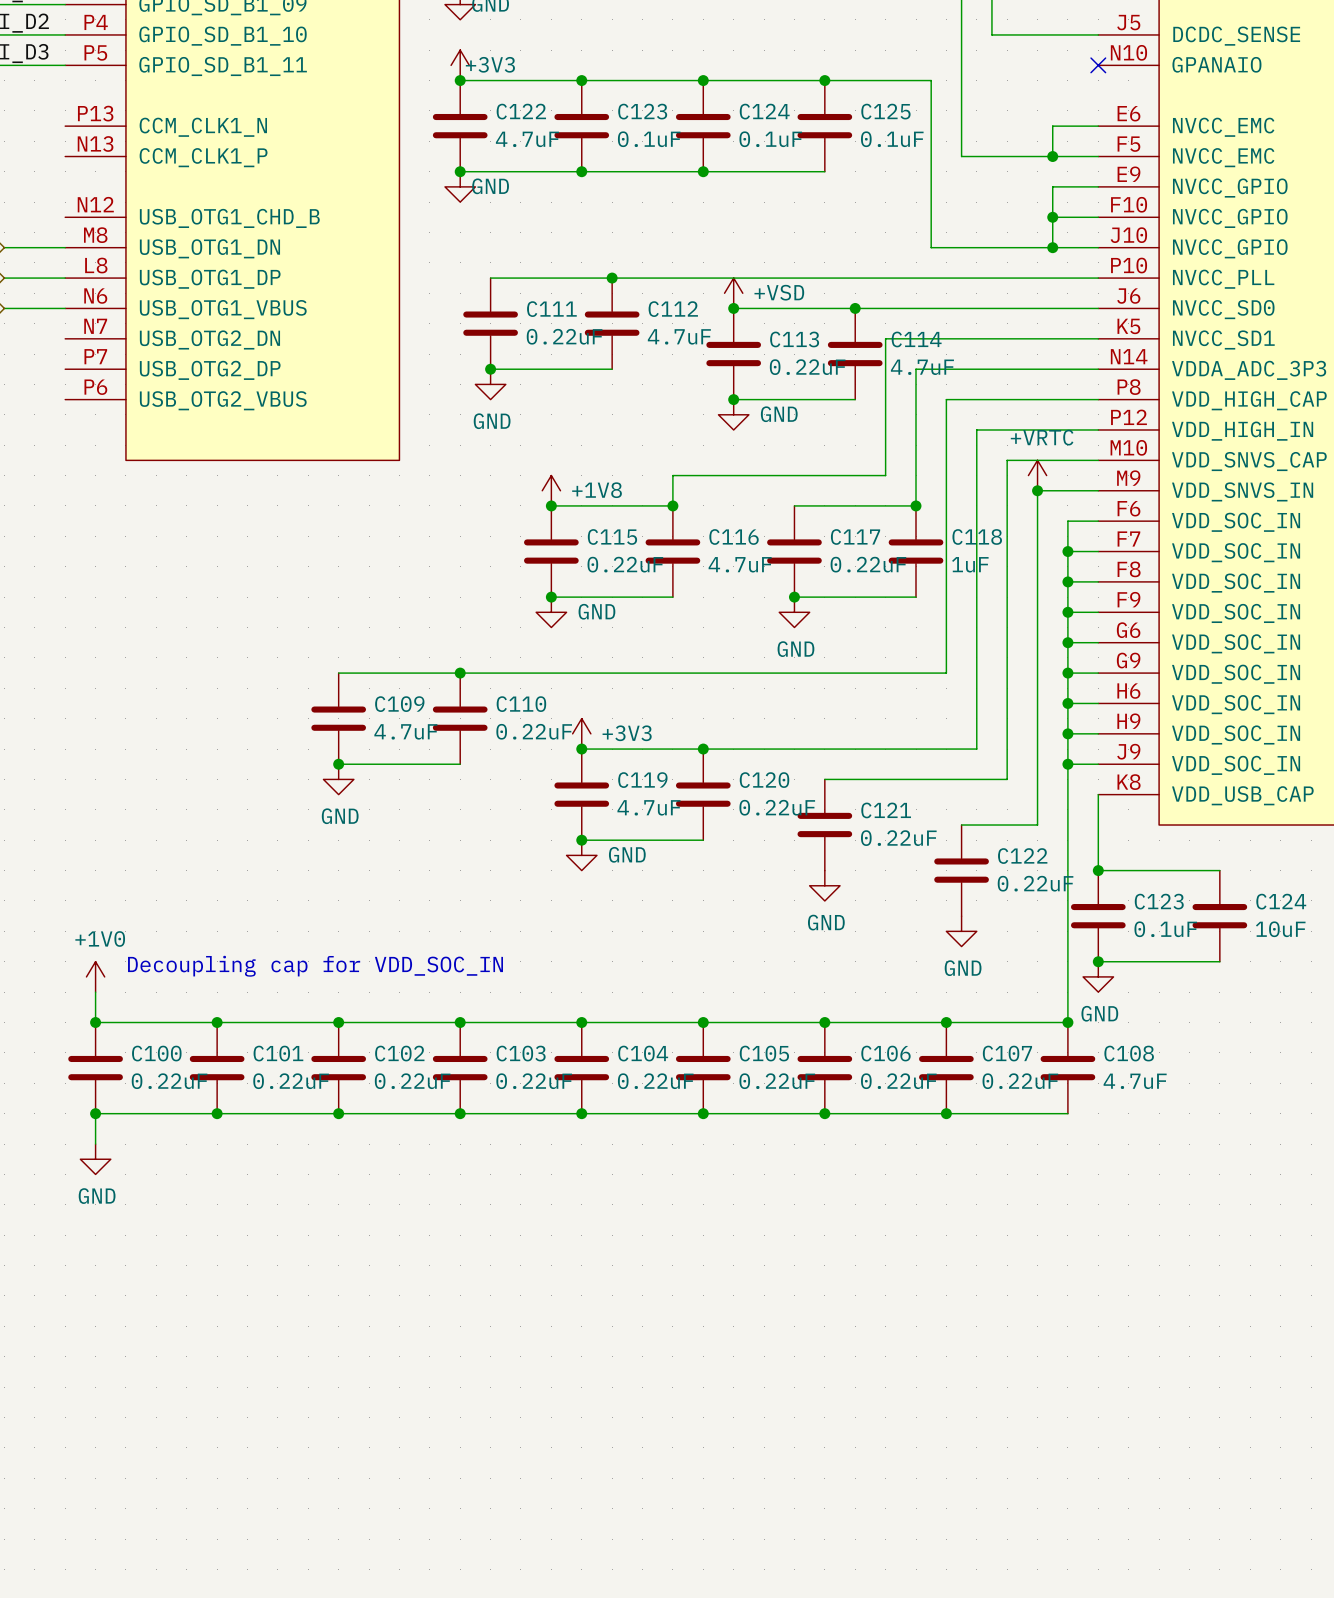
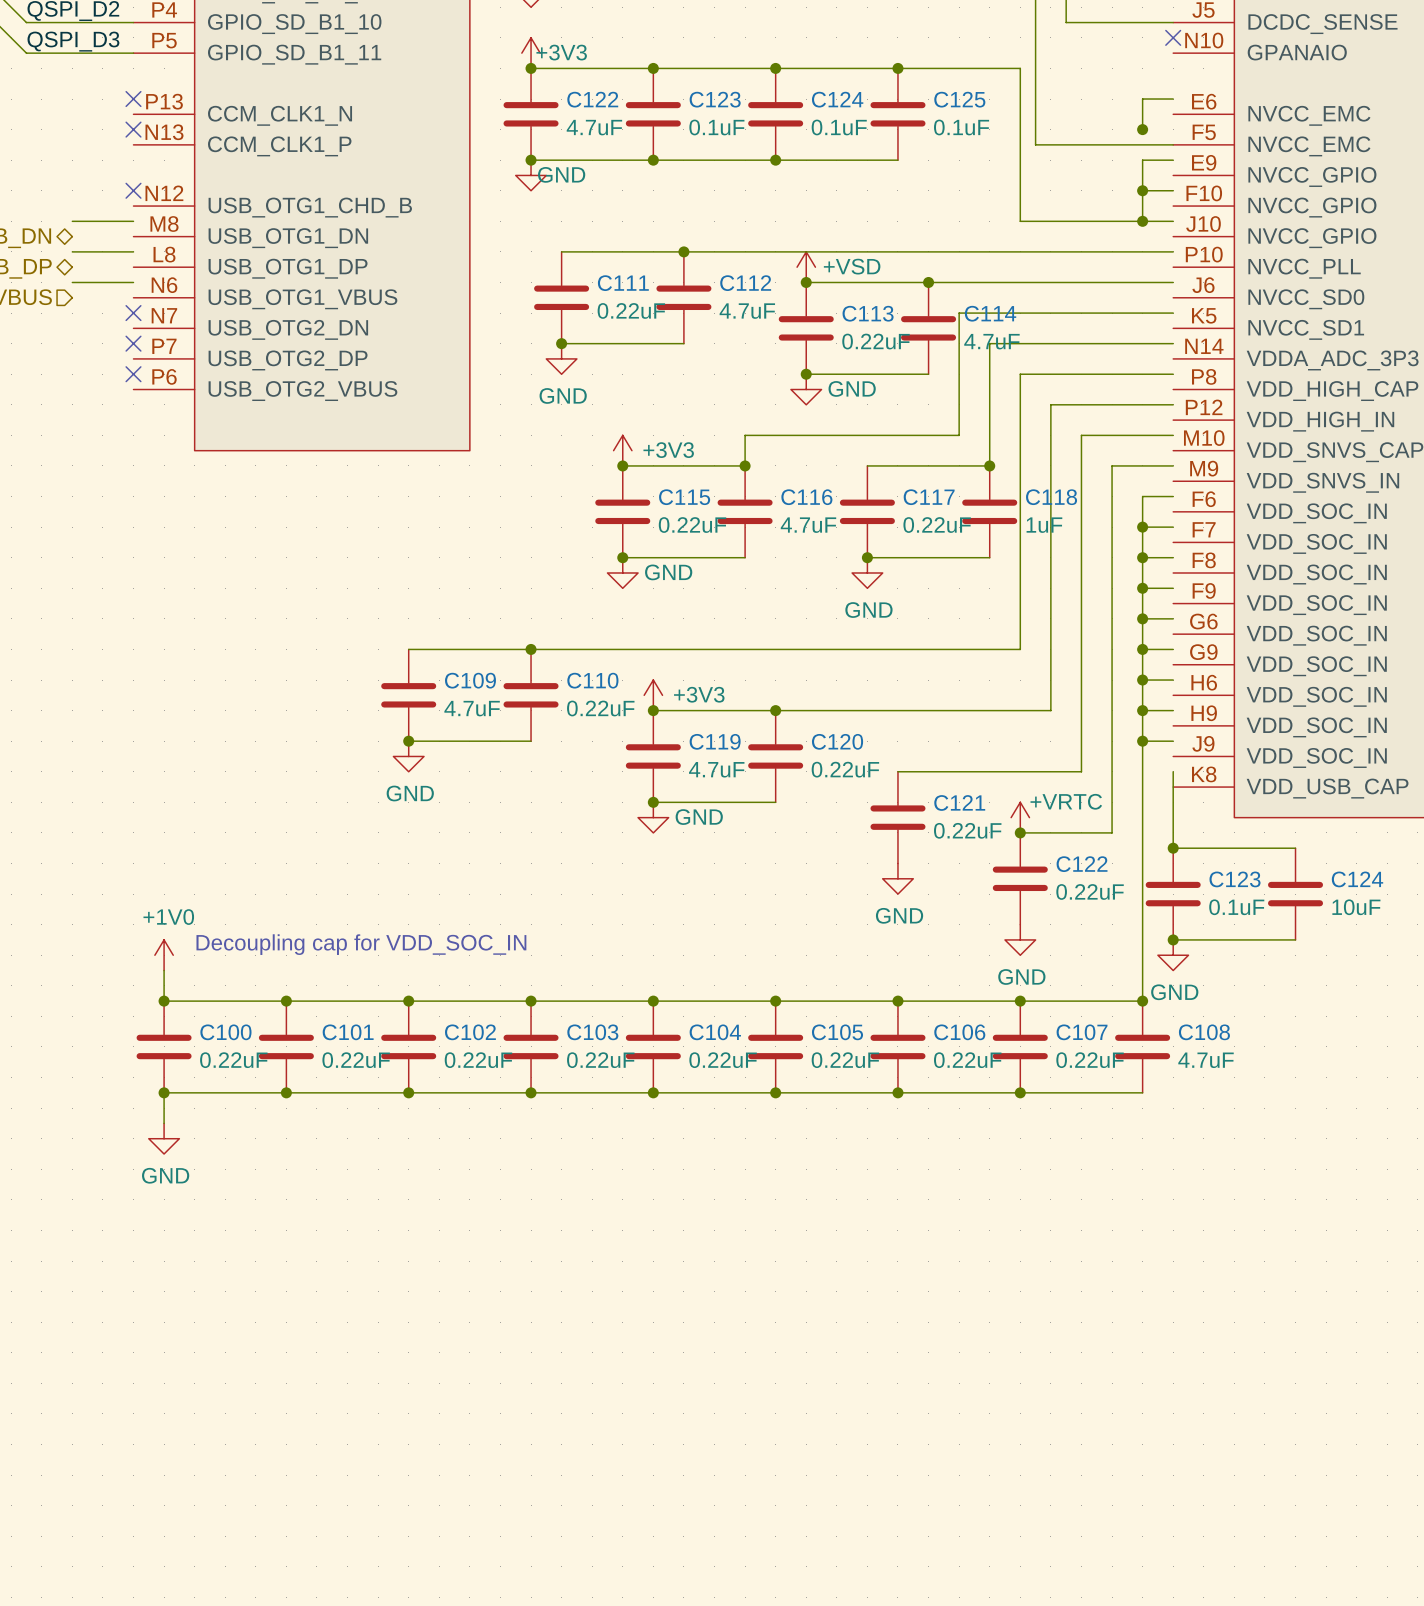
no-connect mark position: (1098, 65) -> (1173, 37)
wire: (931, 80) (931, 247) (1098, 247) -> (1005, 68) (1020, 68) (1020, 221) (1173, 221)
no-connect mark: none -> (133, 99)
wire: none -> (1173, 99) (1142, 99) (1142, 129)
wire: (1098, 126) (1052, 126) (1052, 156) -> none
no-connect mark: none -> (133, 129)
junction position: (1052, 156) -> (1142, 129)
wire: none -> (1173, 160) (1142, 160) (1142, 221)
wire: (1098, 186) (1052, 186) (1052, 247) -> none
no-connect mark: none -> (133, 190)
wire: none -> (1142, 190) (1173, 190)
junction: none -> (1142, 190)
wire: (1052, 217) (1098, 217) -> none
junction: (1052, 217) -> none
junction: none -> (1142, 221)
wire: (4, 247) (65, 247) -> (72, 221) (133, 221)
junction: (1052, 247) -> none
wire: (4, 278) (65, 278) -> (72, 251) (133, 251)
wire: (490, 278) (1098, 278) -> (561, 251) (1173, 251)
junction position: (612, 278) -> (683, 251)
power symbol position: +VSD (733, 293) -> +VSD (806, 267)
wire: (4, 308) (65, 308) -> (72, 282) (133, 282)
wire: (733, 308) (1098, 308) -> (806, 282) (1173, 282)
junction position: (733, 308) -> (806, 282)
junction position: (855, 308) -> (928, 282)
no-connect mark: none -> (133, 313)
C111 position: (490, 323) -> (561, 297)
C112 position: (612, 323) -> (683, 297)
wire: (885, 338) (1098, 338) -> (959, 328) (959, 313) (1173, 313)
no-connect mark: none -> (133, 343)
C113 position: (733, 354) -> (806, 328)
C114 position: (855, 354) -> (928, 328)
wire: (490, 369) (612, 369) -> (561, 343) (683, 343)
junction position: (490, 369) -> (561, 343)
wire: (916, 369) (1098, 369) -> (989, 358) (989, 343) (1173, 343)
no-connect mark: none -> (133, 374)
power symbol position: GND (490, 384) -> GND (561, 358)
wire: (733, 399) (855, 399) -> (806, 374) (928, 374)
junction position: (733, 399) -> (806, 374)
wire: (946, 399) (1098, 399) -> (1020, 389) (1020, 374) (1173, 374)
power symbol position: GND (733, 414) -> GND (806, 389)
wire: (976, 429) (1098, 429) -> (1050, 420) (1050, 404) (1173, 404)
wire: (885, 445) (885, 475) -> (989, 465) (959, 465)
wire: none -> (959, 435) (745, 435) (745, 465) (622, 465)
power symbol: none -> +3V3 (622, 450)
wire: (1007, 460) (1098, 460) -> (1081, 450) (1081, 435) (1173, 435)
junction: none -> (622, 465)
wire: (794, 475) (672, 475) (672, 505) (551, 505) -> none
wire: (916, 475) (916, 505) (794, 505) -> none
power symbol: +VRTC (1037, 475) -> none
power symbol: +1V8 (551, 490) -> none
wire: (1037, 490) (1098, 490) -> (1112, 481) (1112, 465) (1173, 465)
junction: (1037, 490) -> none
junction: (551, 505) -> none
junction position: (672, 505) -> (745, 465)
junction position: (916, 505) -> (989, 465)
wire: (1067, 521) (1098, 521) -> (1142, 511) (1142, 496) (1173, 496)
junction: none -> (1142, 527)
C115 position: (551, 551) -> (622, 511)
C116 position: (672, 551) -> (745, 511)
C117 position: (794, 551) -> (867, 511)
C118 position: (916, 551) -> (989, 511)
wire: (1067, 551) (1098, 551) -> (1142, 527) (1173, 527)
junction: (1067, 551) -> none
junction: none -> (622, 557)
junction: none -> (1142, 557)
wire: (1067, 581) (1098, 581) -> (1142, 557) (1173, 557)
junction: (1067, 581) -> none
wire: (551, 597) (672, 597) -> (622, 557) (745, 557)
junction: (551, 597) -> none
wire: (794, 597) (916, 597) -> (867, 557) (989, 557)
junction position: (794, 597) -> (867, 557)
junction: none -> (1142, 588)
power symbol position: GND (551, 612) -> GND (622, 572)
power symbol position: GND (794, 612) -> GND (867, 572)
wire: (1067, 612) (1098, 612) -> (1142, 588) (1173, 588)
junction: (1067, 612) -> none
junction: none -> (1142, 618)
wire: (1067, 642) (1098, 642) -> (1142, 618) (1173, 618)
junction: (1067, 642) -> none
wire: (946, 657) (946, 673) (338, 673) -> (1020, 649) (408, 649)
junction: none -> (1142, 649)
junction position: (460, 673) -> (531, 649)
wire: (1067, 673) (1098, 673) -> (1142, 649) (1173, 649)
junction: (1067, 673) -> none
junction: none -> (1142, 680)
wire: (1067, 703) (1098, 703) -> (1142, 680) (1173, 680)
junction: (1067, 703) -> none
C109 position: (338, 718) -> (408, 695)
C110 position: (460, 718) -> (531, 695)
junction: none -> (653, 710)
wire: (976, 718) (976, 749) (581, 749) -> (1050, 710) (653, 710)
junction: none -> (1142, 710)
power symbol position: +3V3 (581, 733) -> +3V3 (653, 695)
wire: (1067, 733) (1098, 733) -> (1142, 710) (1173, 710)
junction: (1067, 733) -> none
junction: (581, 749) -> none
junction position: (703, 749) -> (775, 710)
junction: none -> (1142, 741)
wire: (338, 764) (460, 764) -> (408, 741) (531, 741)
junction position: (338, 764) -> (408, 741)
wire: (1067, 764) (1098, 764) -> (1142, 741) (1173, 741)
junction: (1067, 764) -> none
power symbol position: GND (338, 779) -> GND (408, 756)
wire: none -> (1173, 771) (1173, 787)
C119 position: (581, 794) -> (653, 756)
C120 position: (703, 794) -> (775, 756)
junction: none -> (653, 802)
power symbol: none -> +VRTC (1020, 817)
wire: (961, 825) (1037, 825) -> (1020, 832) (1112, 832) (1112, 817)
wire: (581, 840) (703, 840) -> (653, 802) (775, 802)
junction: (581, 840) -> none
junction: none -> (1020, 832)
power symbol position: GND (581, 855) -> GND (653, 817)
wire: (1098, 855) (1098, 870) (1219, 870) -> (1173, 848) (1295, 848)
C122 position: (961, 870) -> (1020, 878)
junction position: (1098, 870) -> (1173, 848)
C123 position: (1098, 916) -> (1173, 894)
C124 position: (1219, 916) -> (1295, 894)
power symbol position: GND (961, 931) -> GND (1020, 939)
wire: (1098, 961) (1219, 961) -> (1173, 939) (1295, 939)
junction position: (1098, 961) -> (1173, 939)
text position: Decoupling cap for VDD_SOC_IN (315, 966) -> Decoupling cap for VDD_SOC_IN (361, 944)
power symbol position: +1V0 (95, 976) -> +1V0 (164, 955)
power symbol position: GND (1098, 976) -> GND (1173, 955)
wire: (95, 1007) (95, 1022) (1067, 1022) (1067, 1007) -> (164, 1001) (1142, 1001)
junction position: (95, 1022) -> (164, 1001)
junction position: (217, 1022) -> (286, 1001)
junction position: (338, 1022) -> (408, 1001)
junction position: (460, 1022) -> (531, 1001)
junction position: (581, 1022) -> (653, 1001)
junction position: (703, 1022) -> (775, 1001)
junction position: (824, 1022) -> (897, 1001)
junction position: (946, 1022) -> (1020, 1001)
junction position: (1067, 1022) -> (1142, 1001)
C100 position: (95, 1068) -> (164, 1046)
C101 position: (217, 1068) -> (286, 1046)
C102 position: (338, 1068) -> (408, 1046)
C103 position: (460, 1068) -> (531, 1046)
C104 position: (581, 1068) -> (653, 1046)
C105 position: (703, 1068) -> (775, 1046)
C106 position: (824, 1068) -> (897, 1046)
C107 position: (946, 1068) -> (1020, 1046)
C108 position: (1067, 1068) -> (1142, 1046)
wire: (95, 1113) (1067, 1113) -> (164, 1108) (164, 1092) (1142, 1092)
junction position: (95, 1113) -> (164, 1092)
junction position: (217, 1113) -> (286, 1092)
junction position: (338, 1113) -> (408, 1092)
junction position: (460, 1113) -> (531, 1092)
junction position: (581, 1113) -> (653, 1092)
junction position: (703, 1113) -> (775, 1092)
junction position: (824, 1113) -> (897, 1092)
junction position: (946, 1113) -> (1020, 1092)
power symbol position: GND (95, 1159) -> GND (164, 1138)

